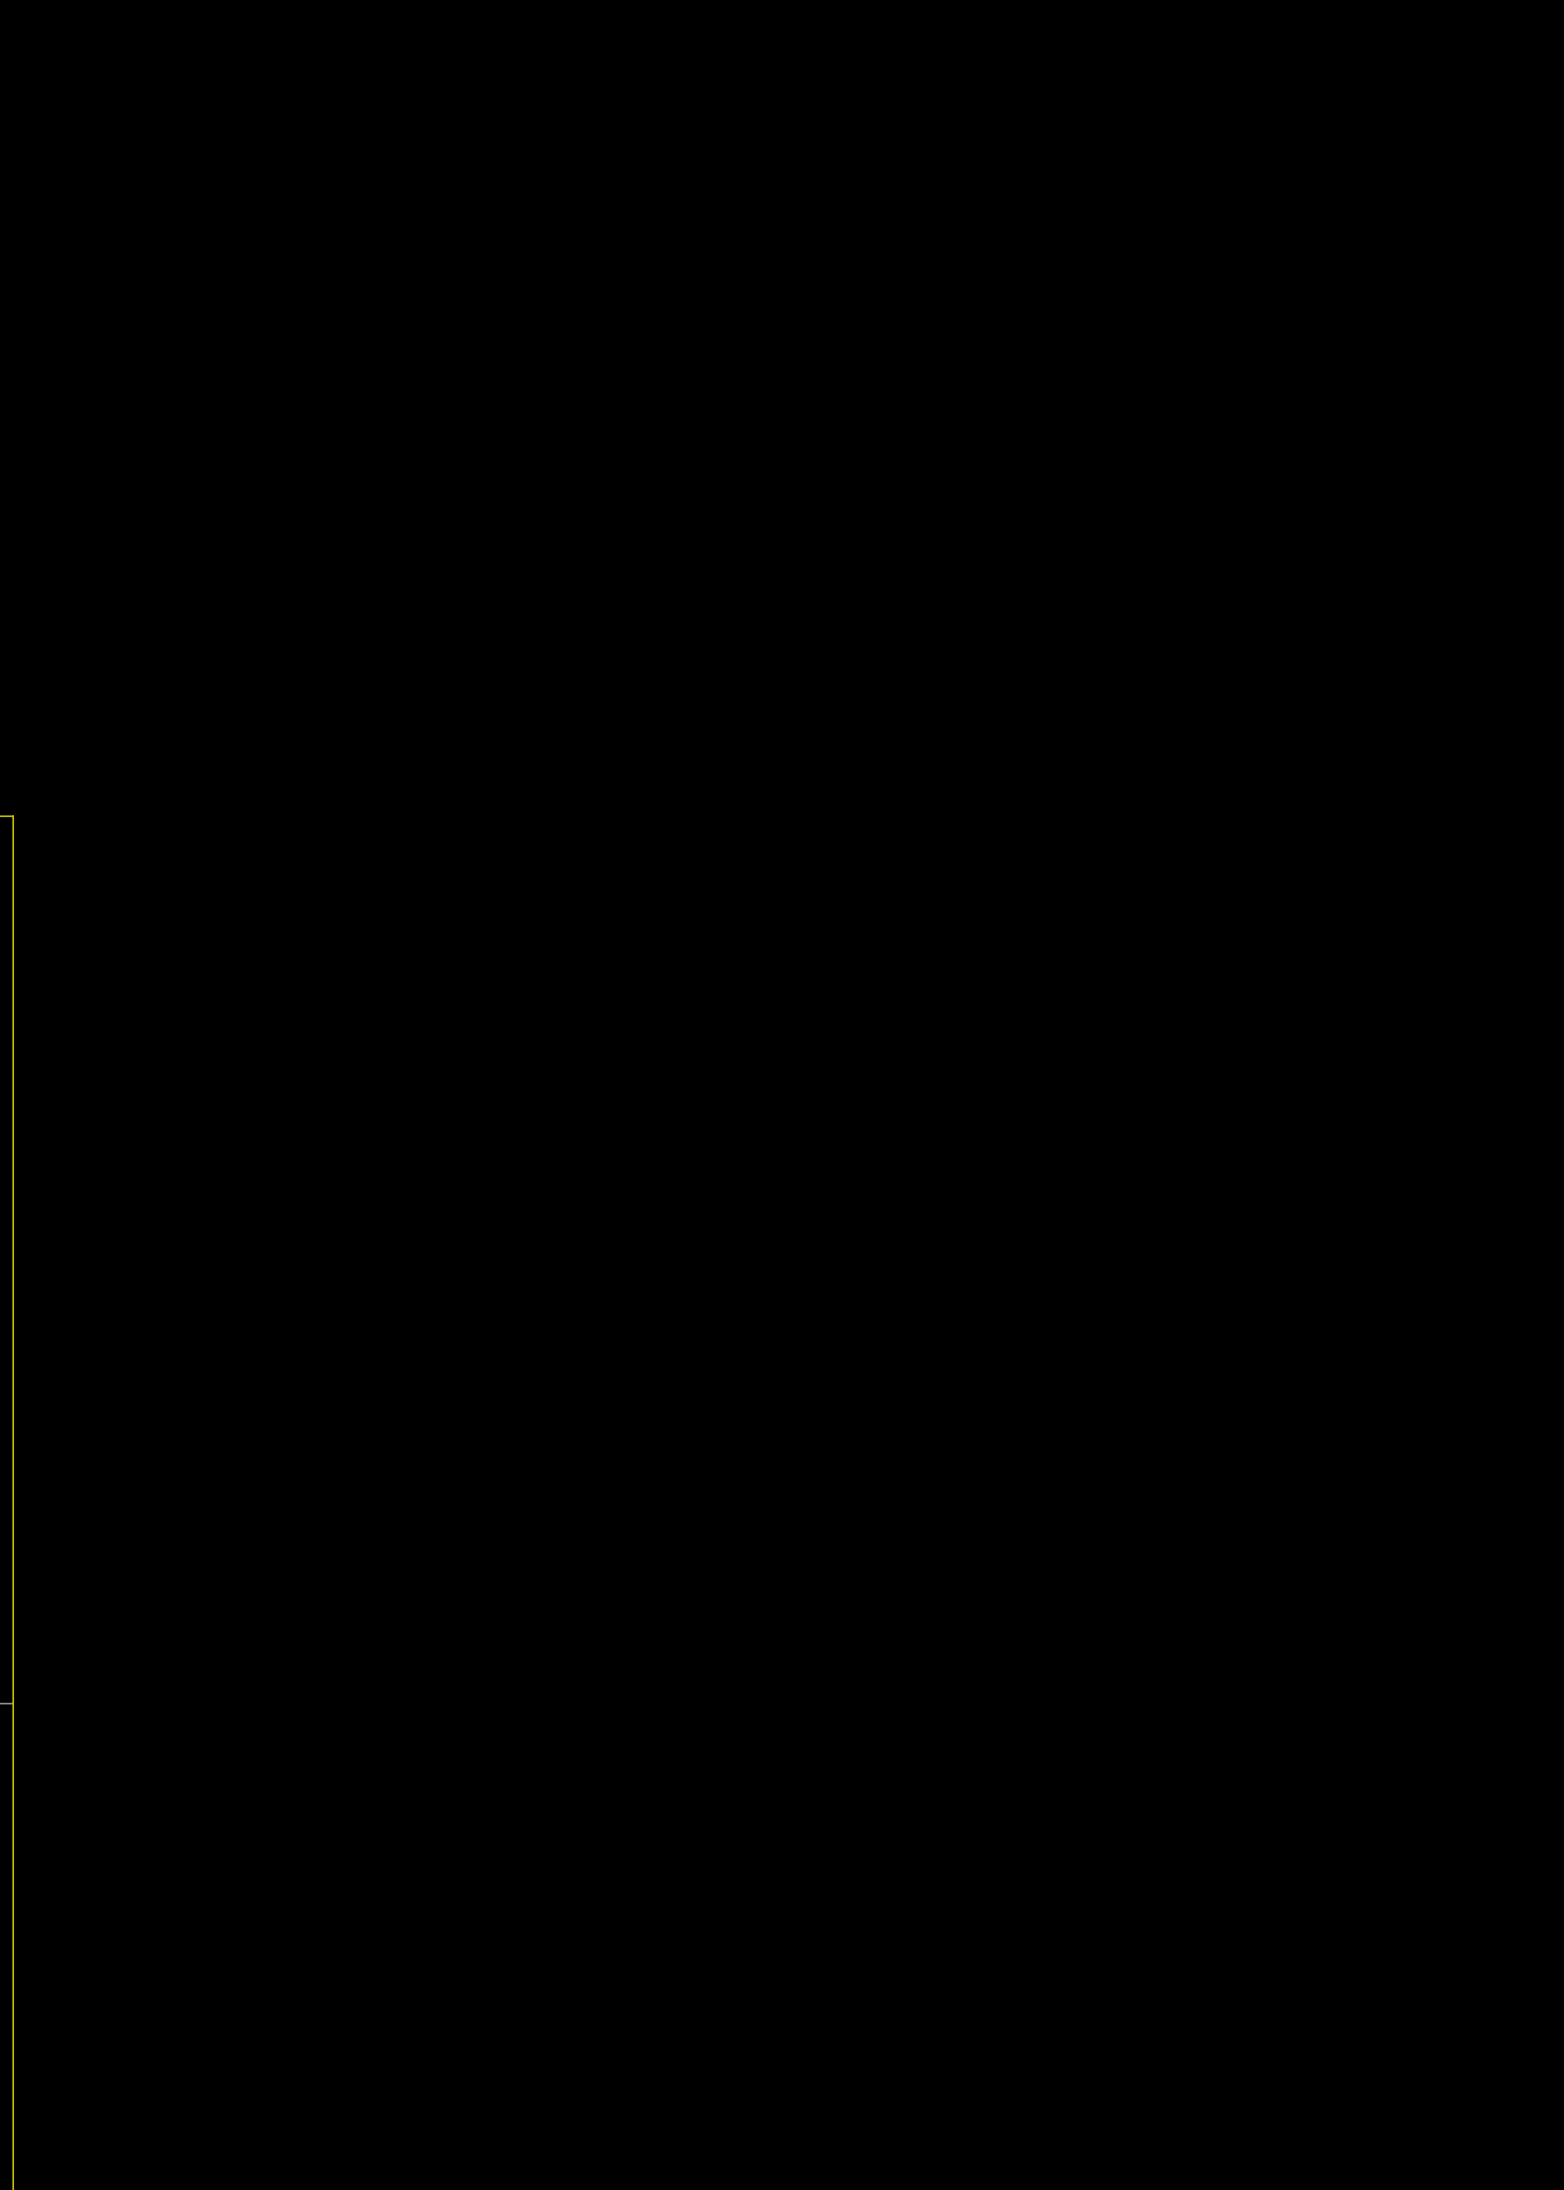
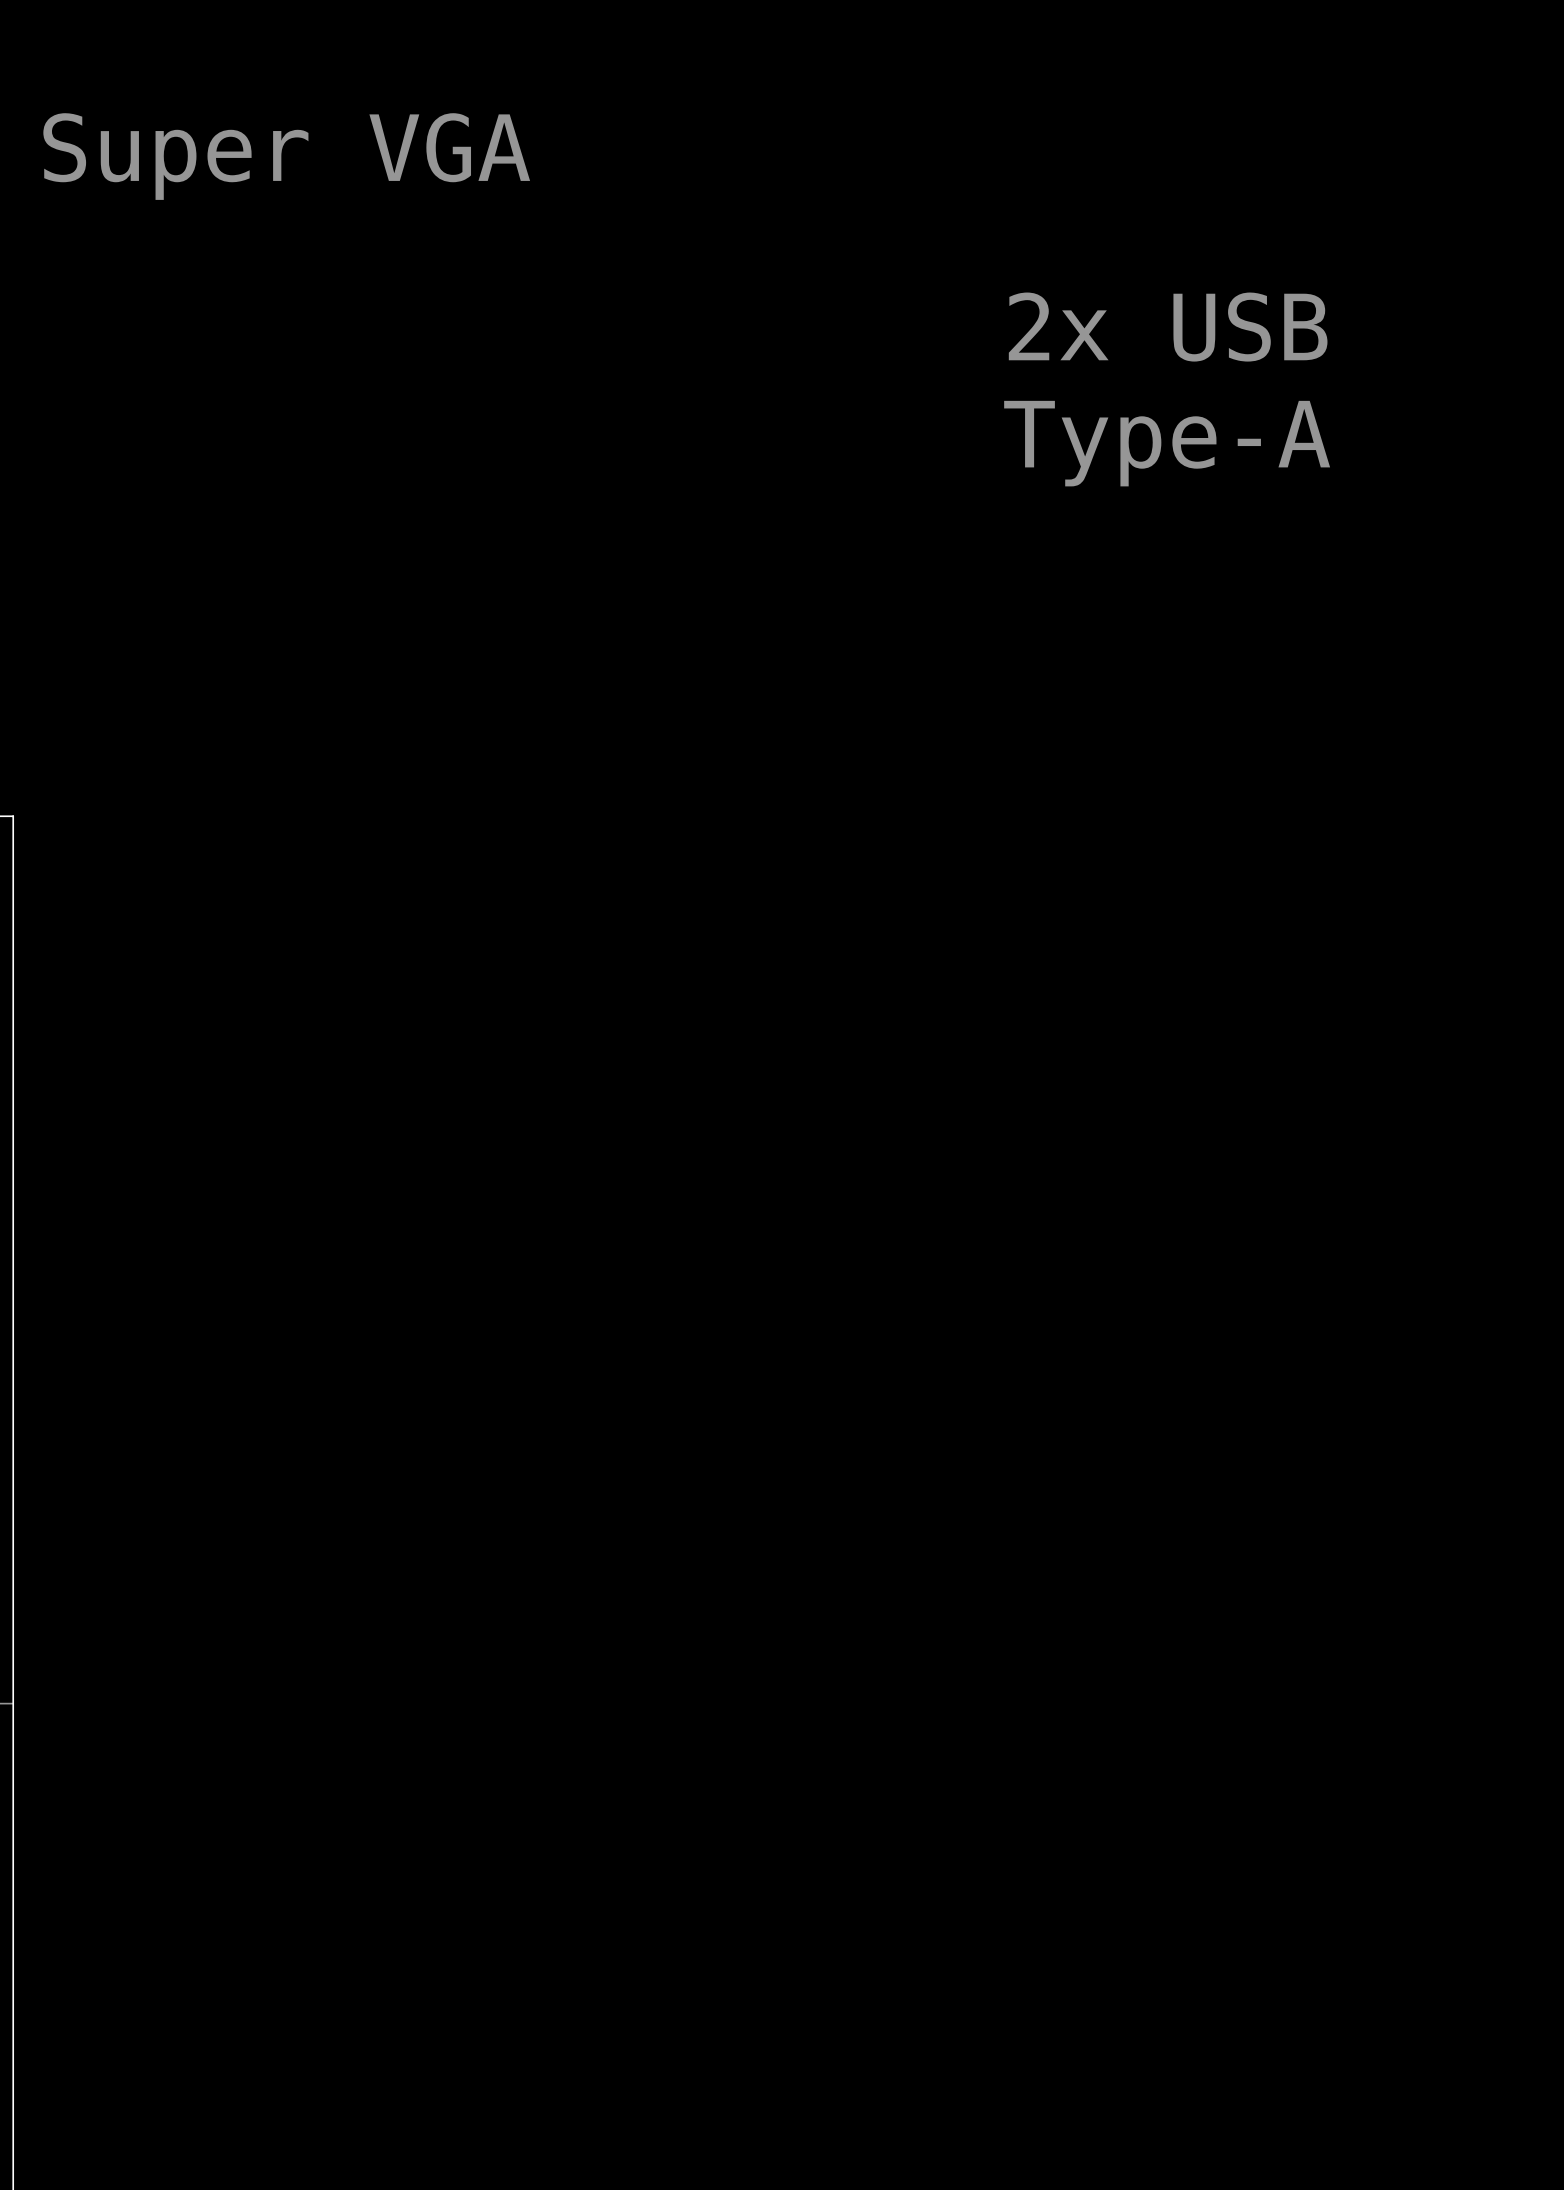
text: none -> Super VGA (286, 156)
text: none -> 2x USB (1168, 327)
text: none -> Type-A (1167, 443)

